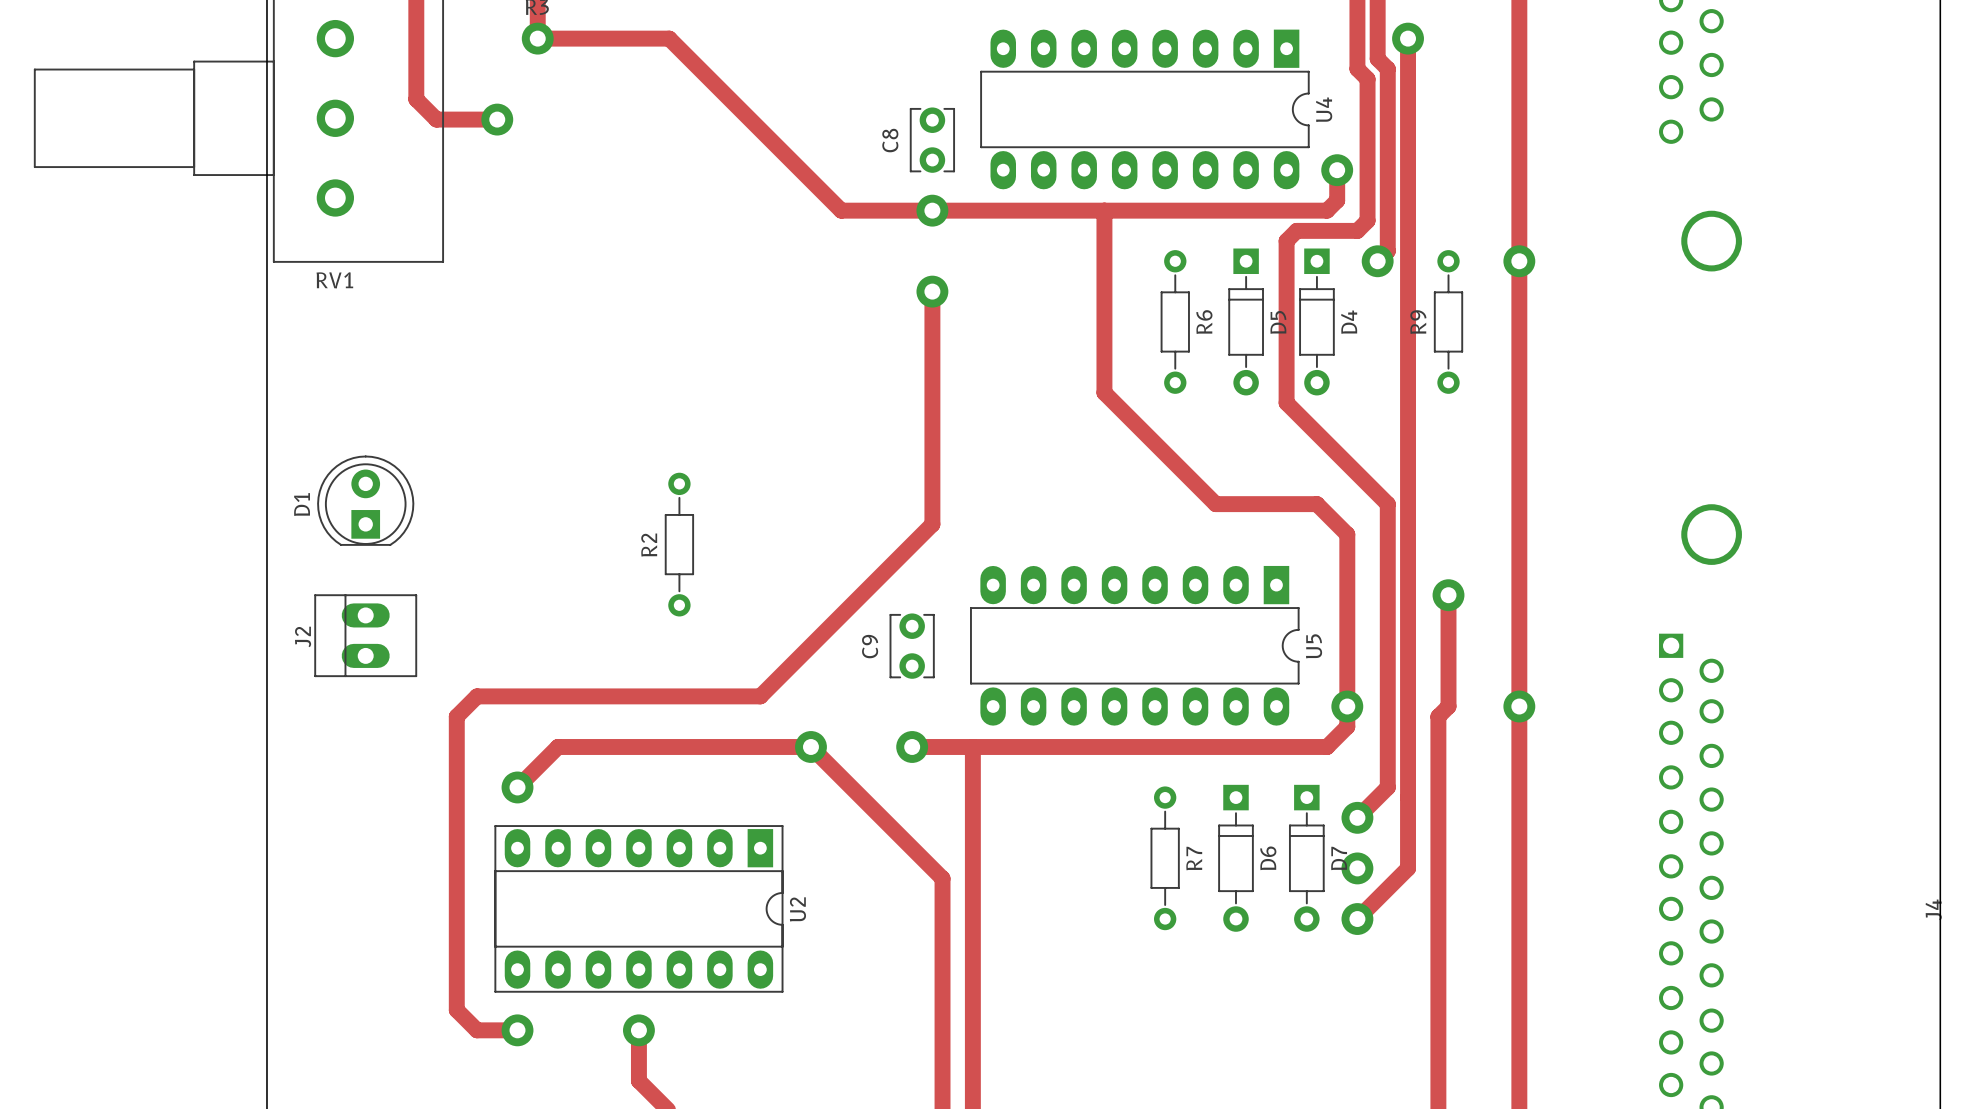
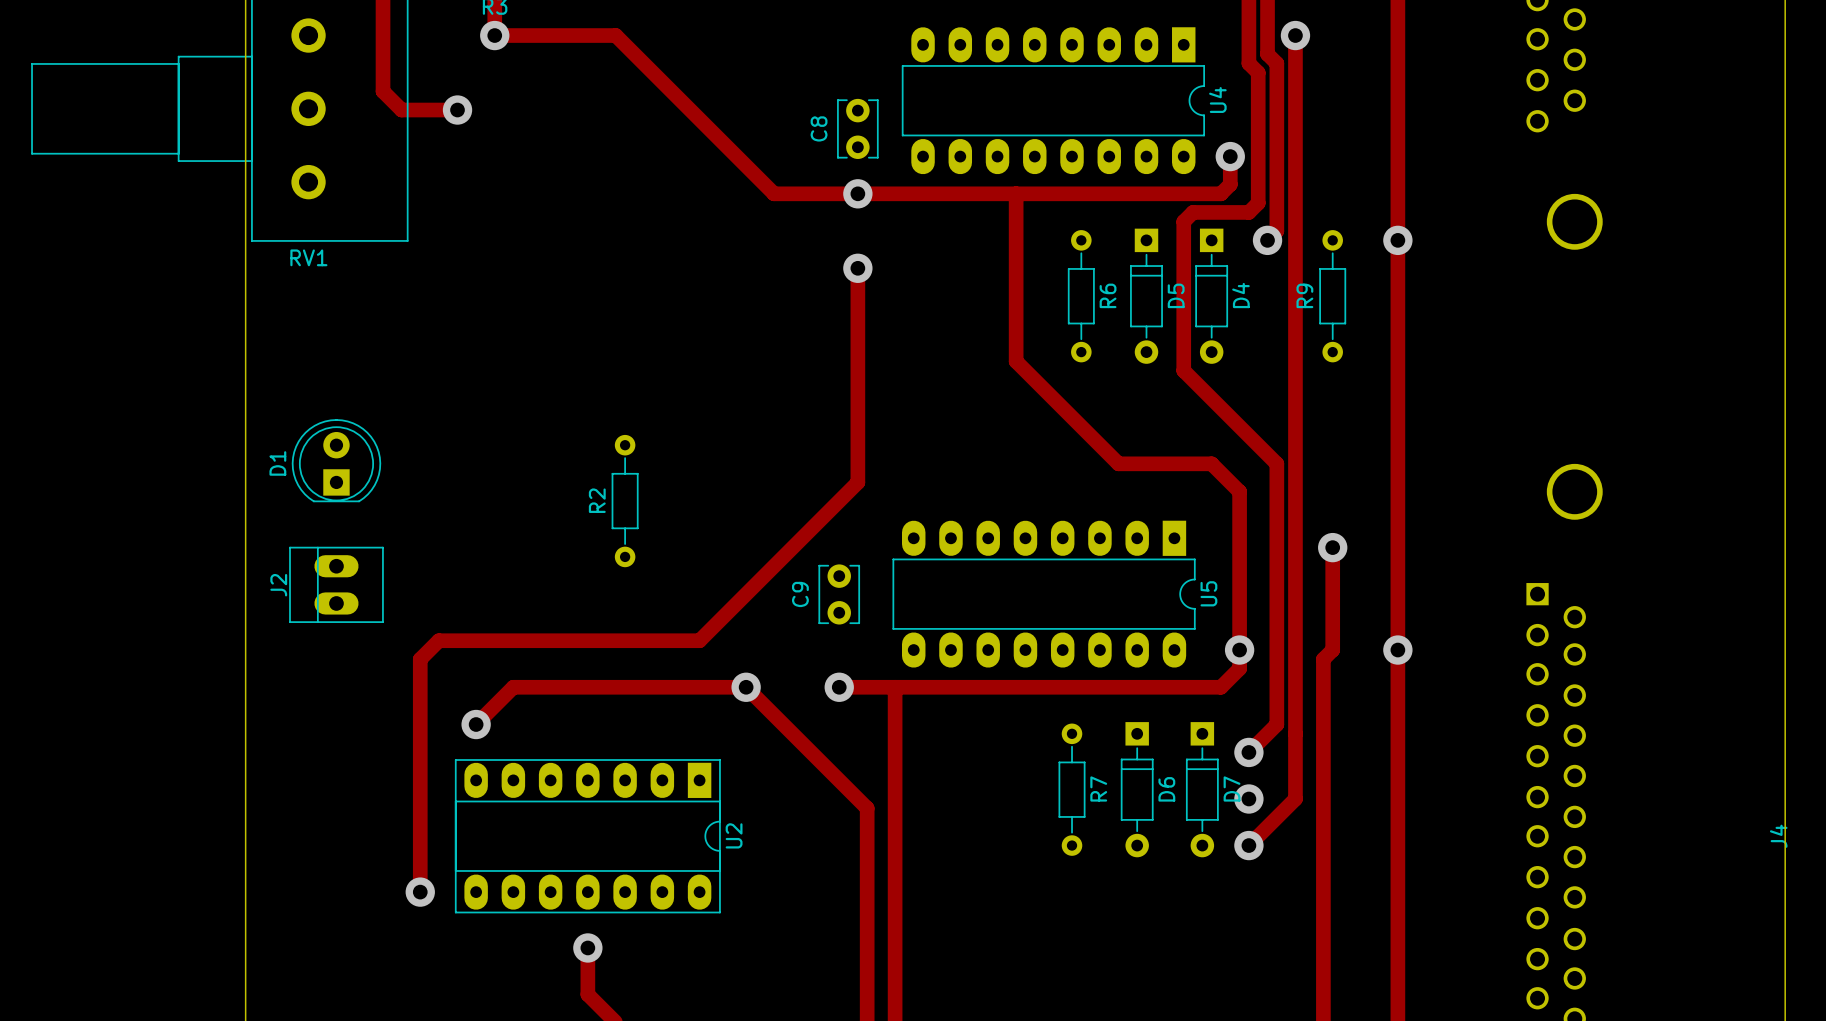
track: (456, 969) (456, 1010) (477, 1030) (517, 1030) -> none
via position: (517, 1030) -> (420, 892)

